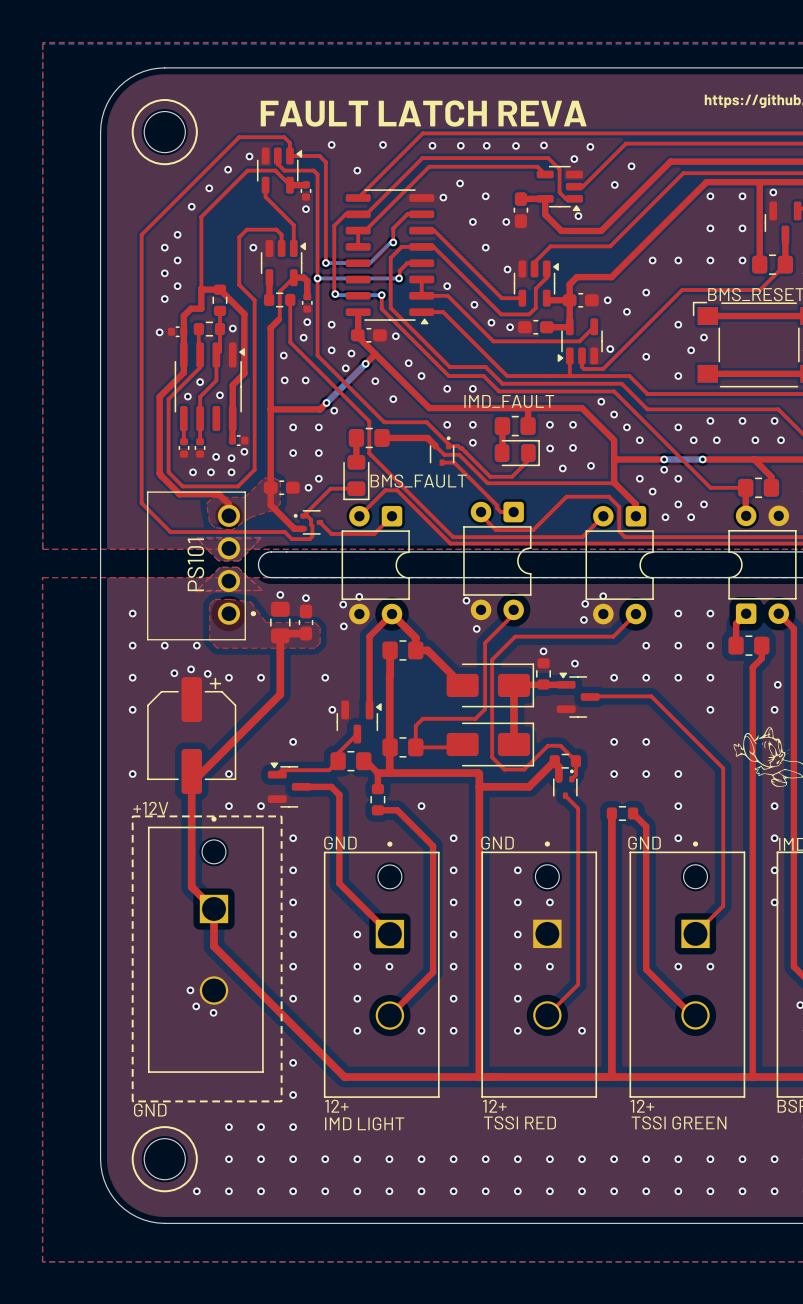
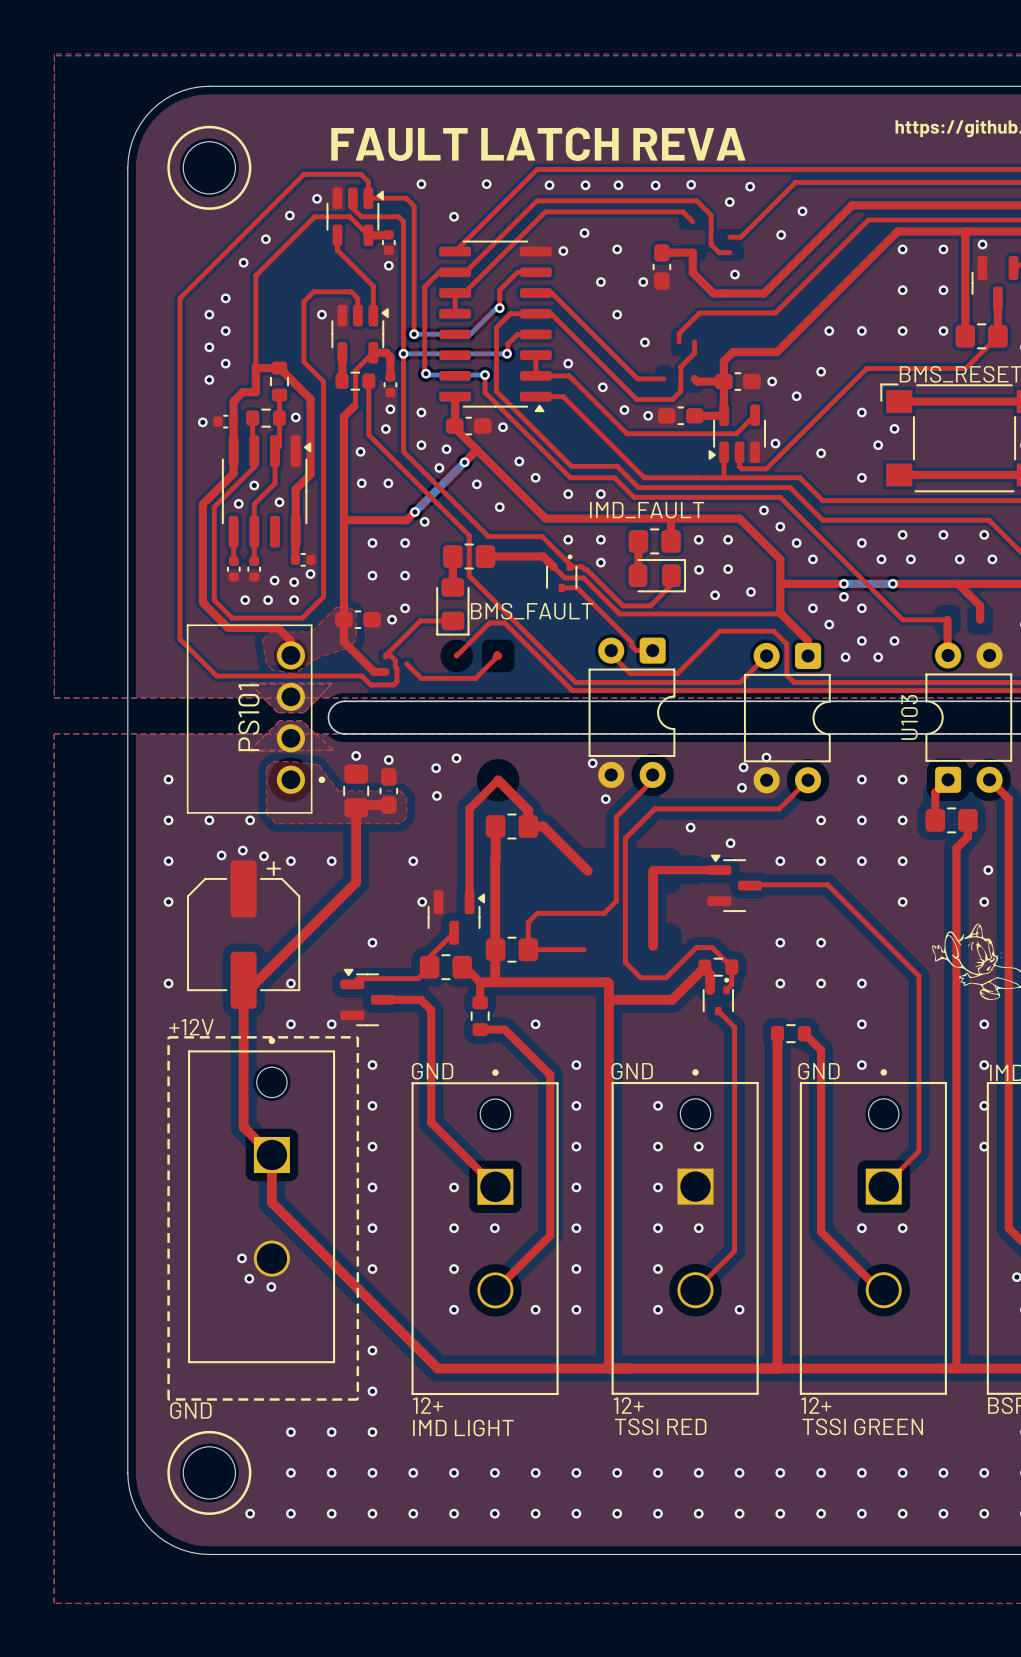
part: (559, 188) -> none
part: (536, 283) -> none
part: (758, 487) -> none
part: (308, 522) -> none
U103 name: none -> U103 (909, 717)
part: (375, 565) -> none
part: (543, 673) -> none
part: (490, 685) -> none
part: (490, 744) -> none

